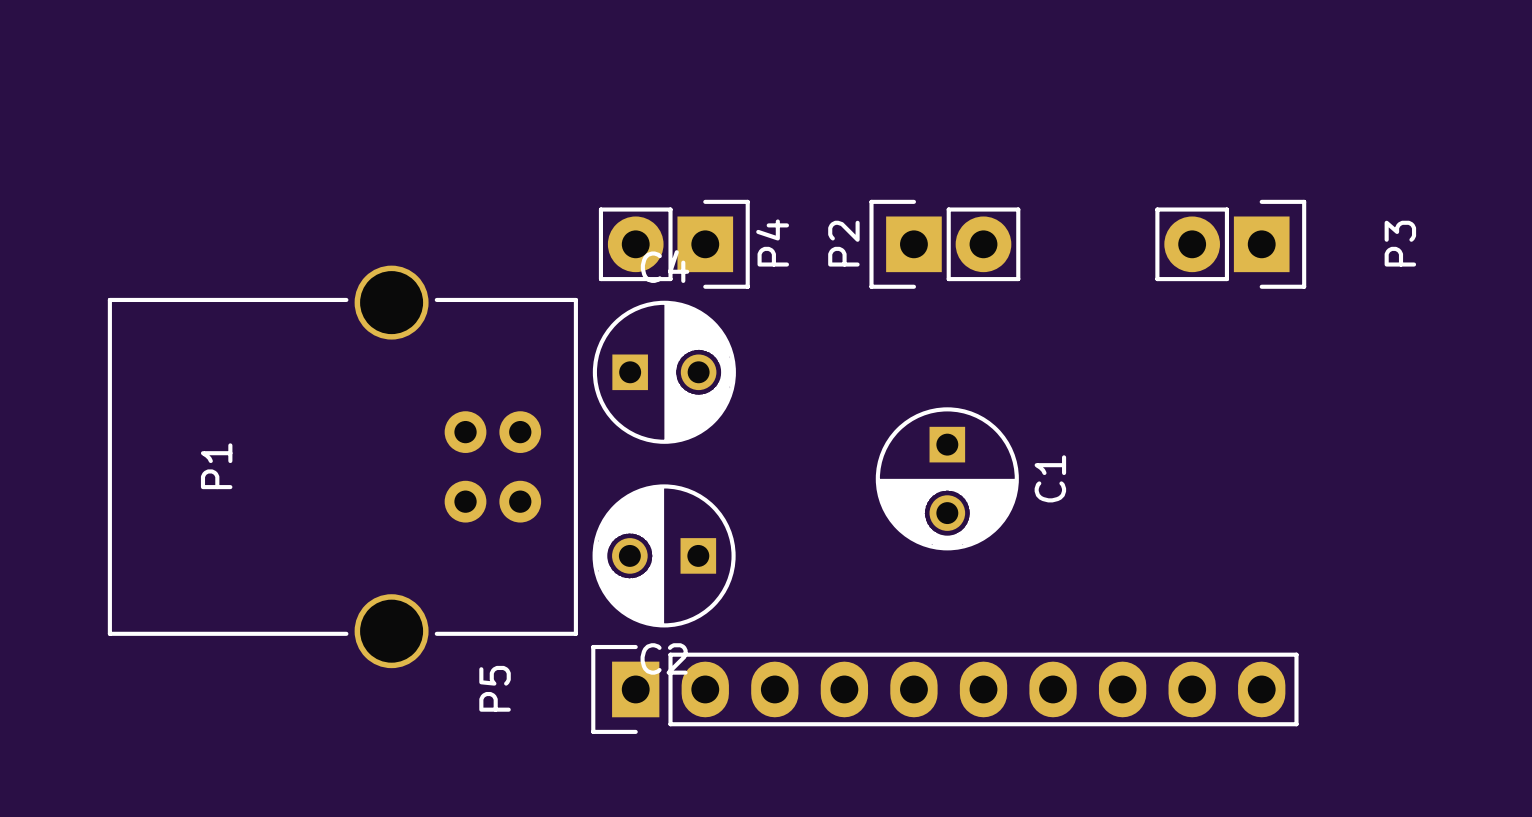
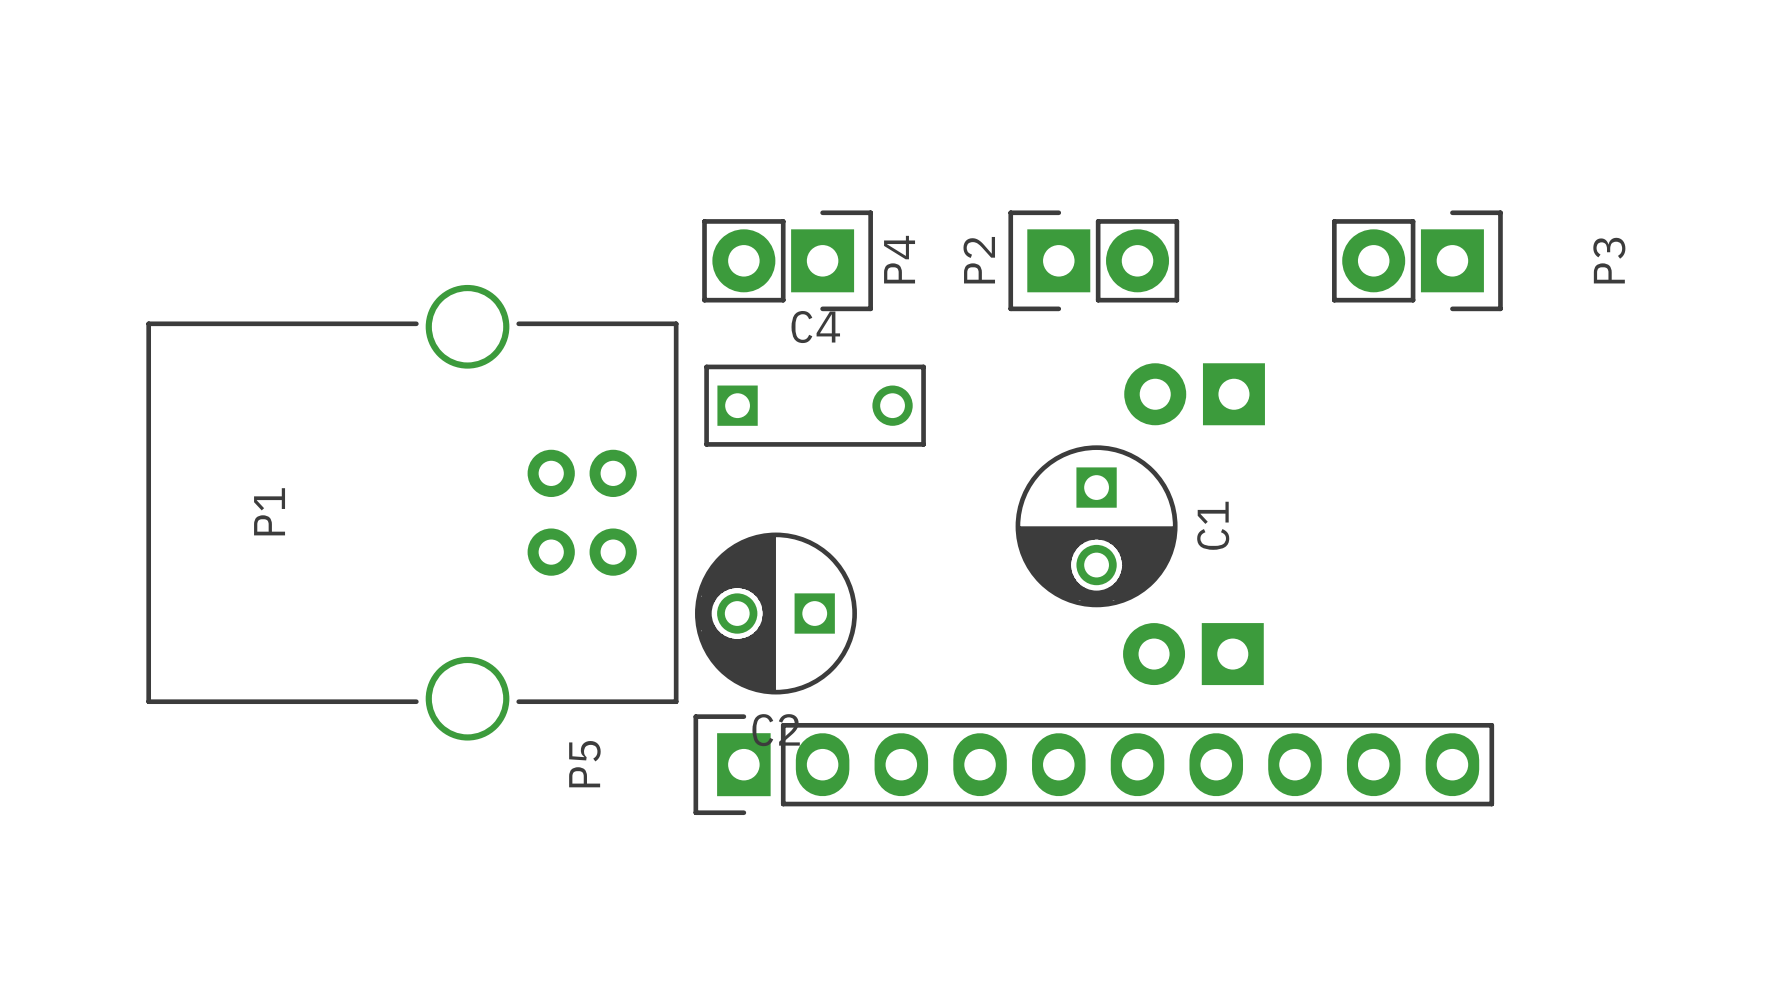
C4 footprint: [592, 300, 736, 444] -> [704, 364, 926, 447]
part: none -> (1194, 394)
part: none -> (1193, 654)

